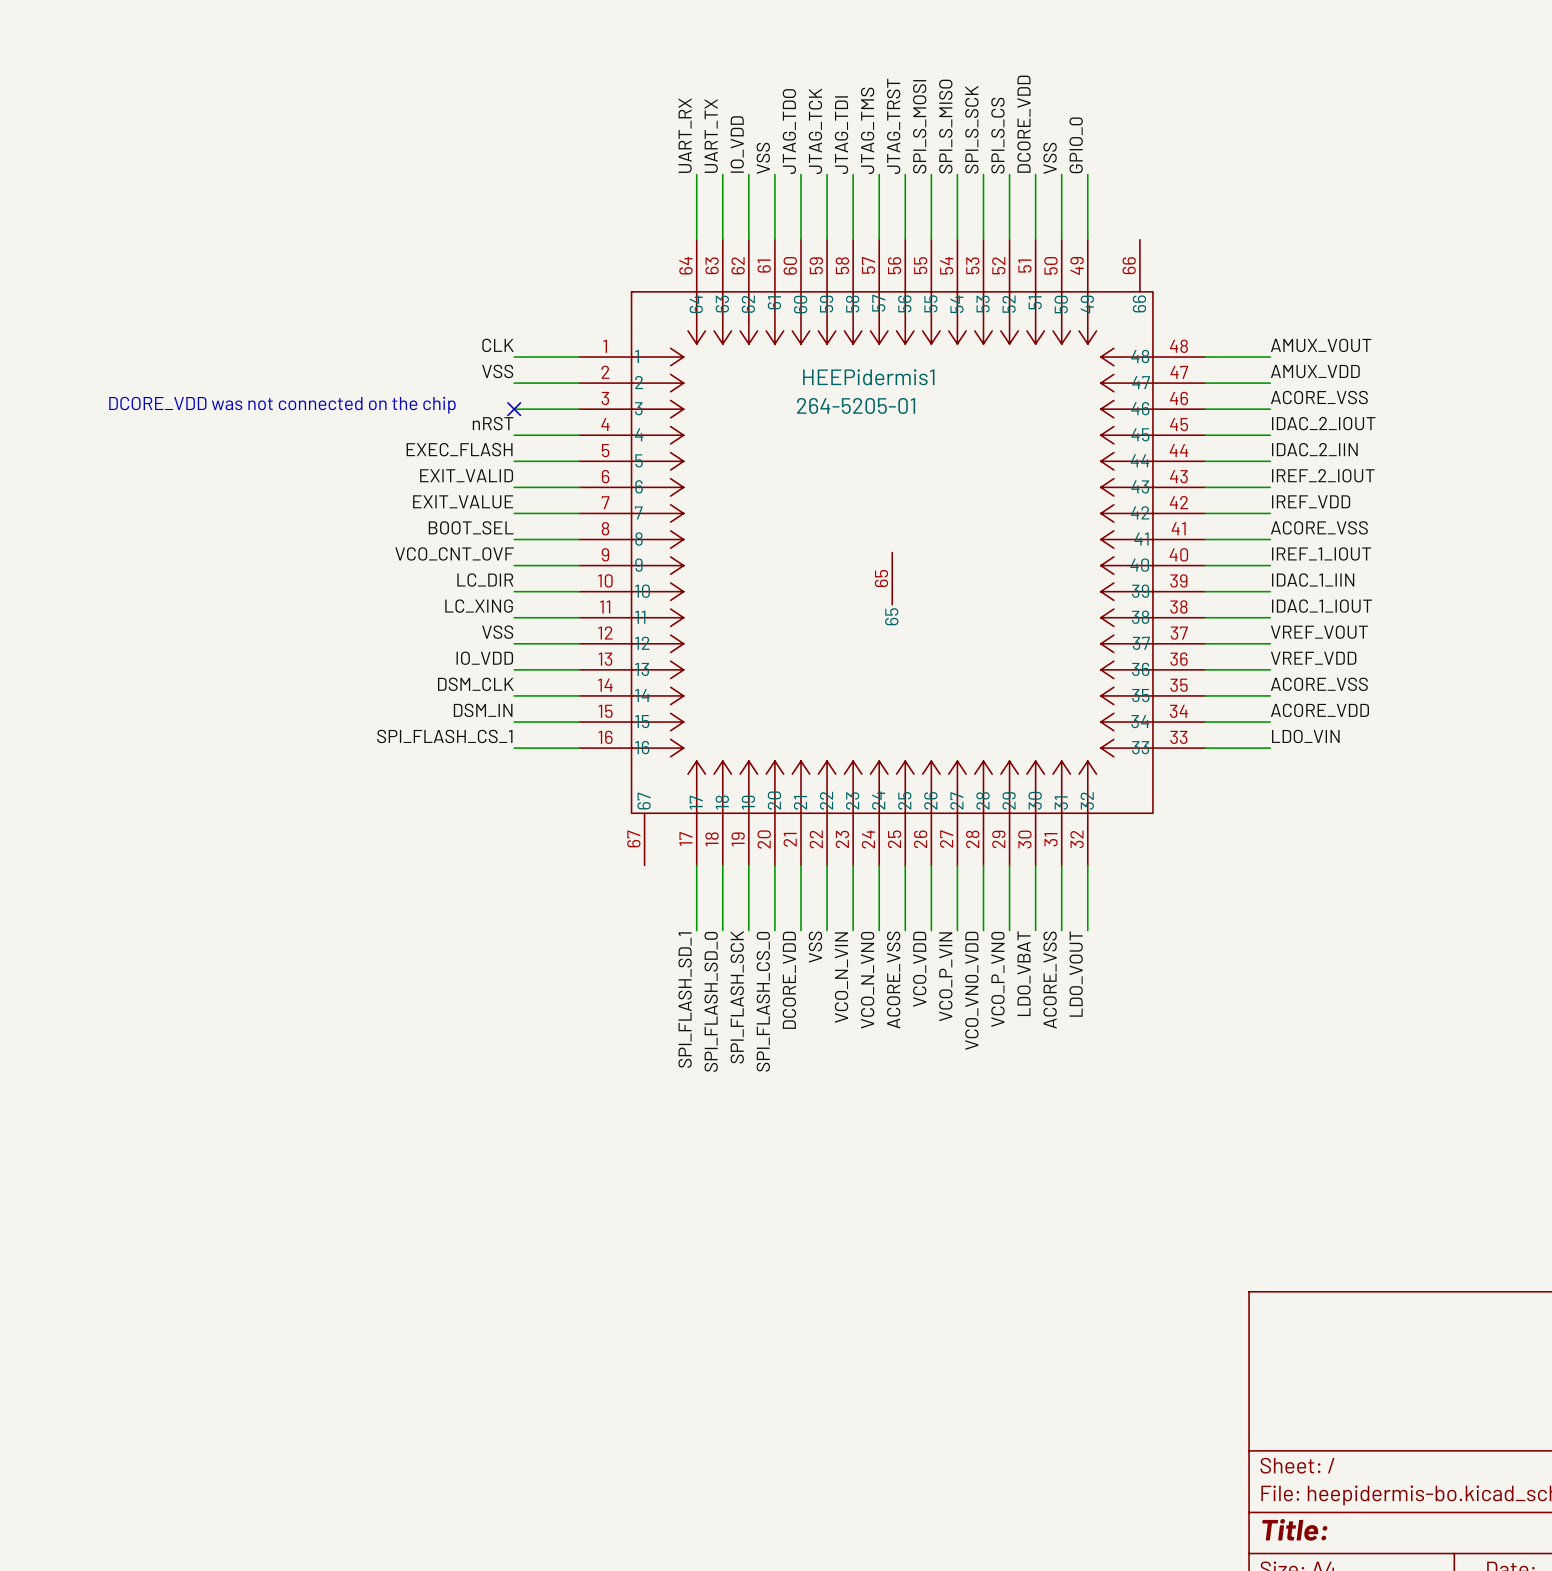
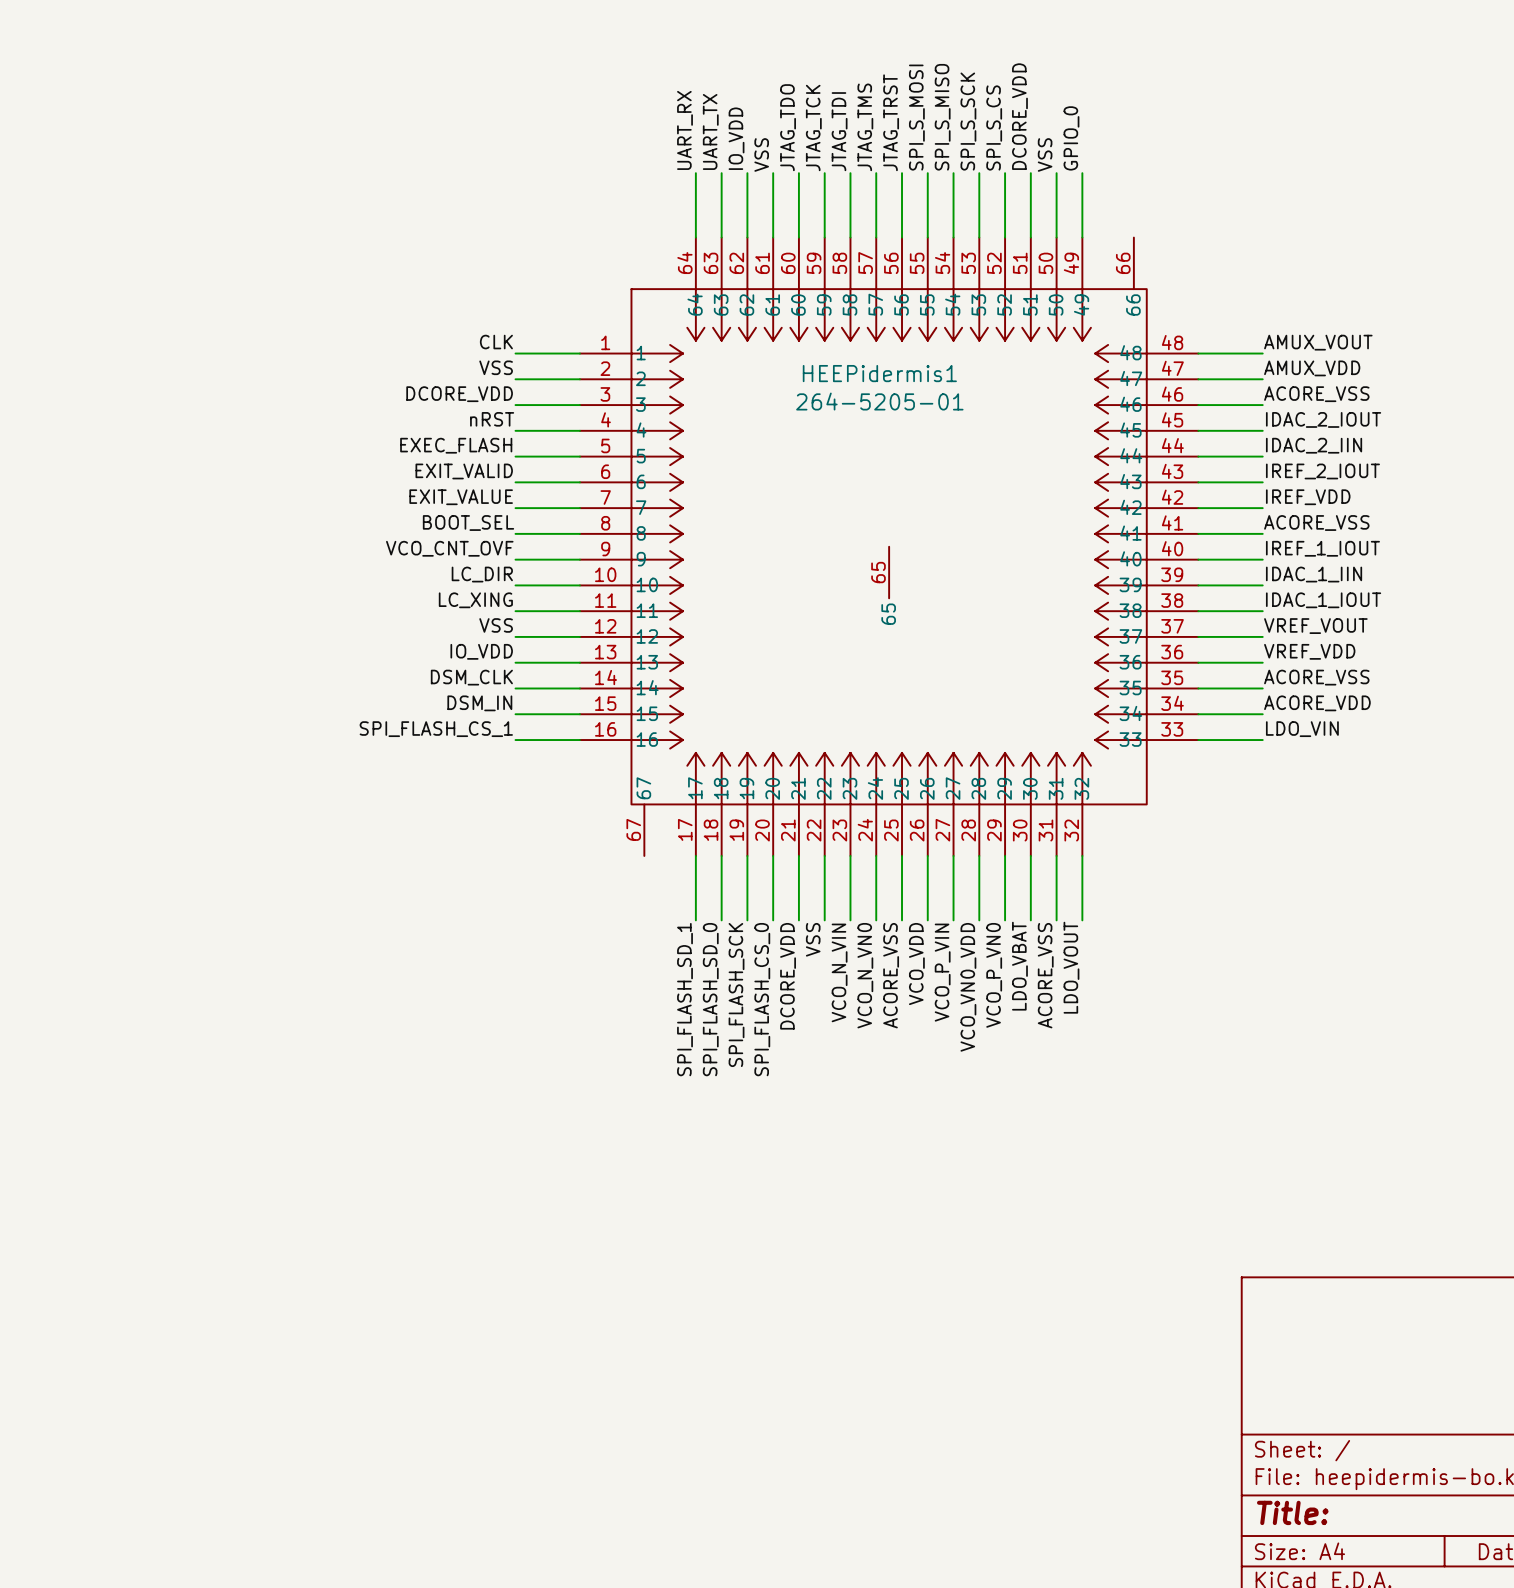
label: none -> DCORE_VDD (459, 394)
text: DCORE_VDD was not connected on the chip (282, 405) -> none
no-connect mark: (514, 409) -> none

